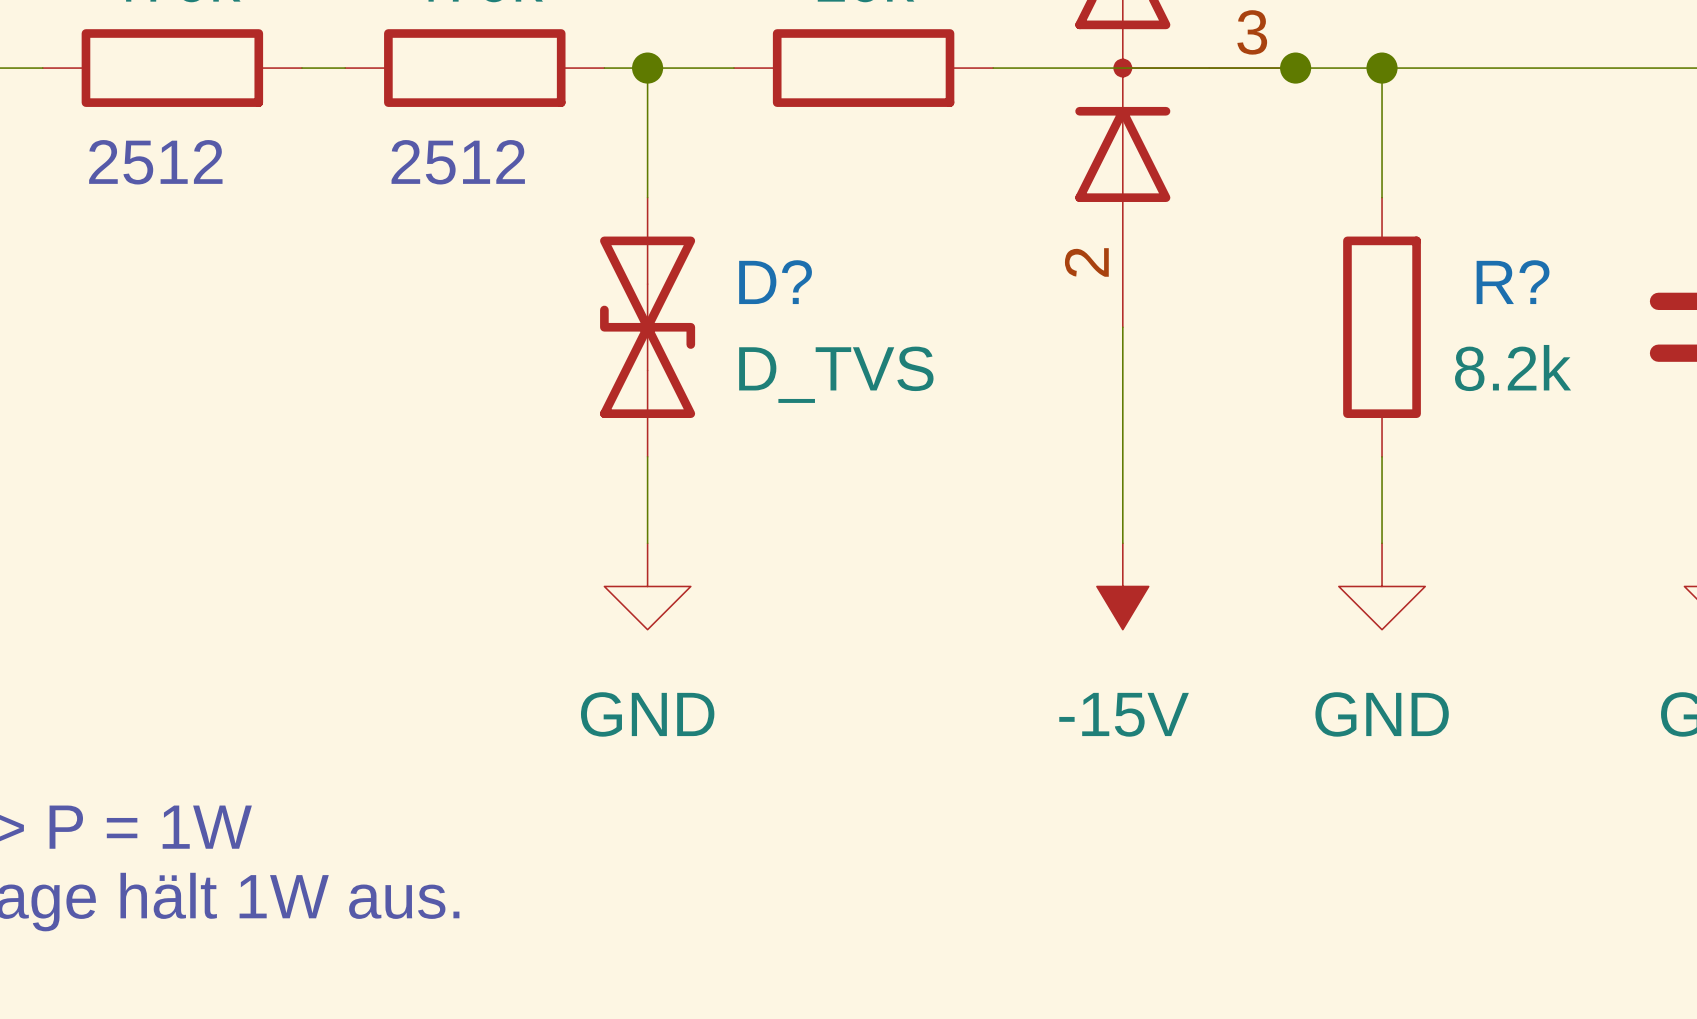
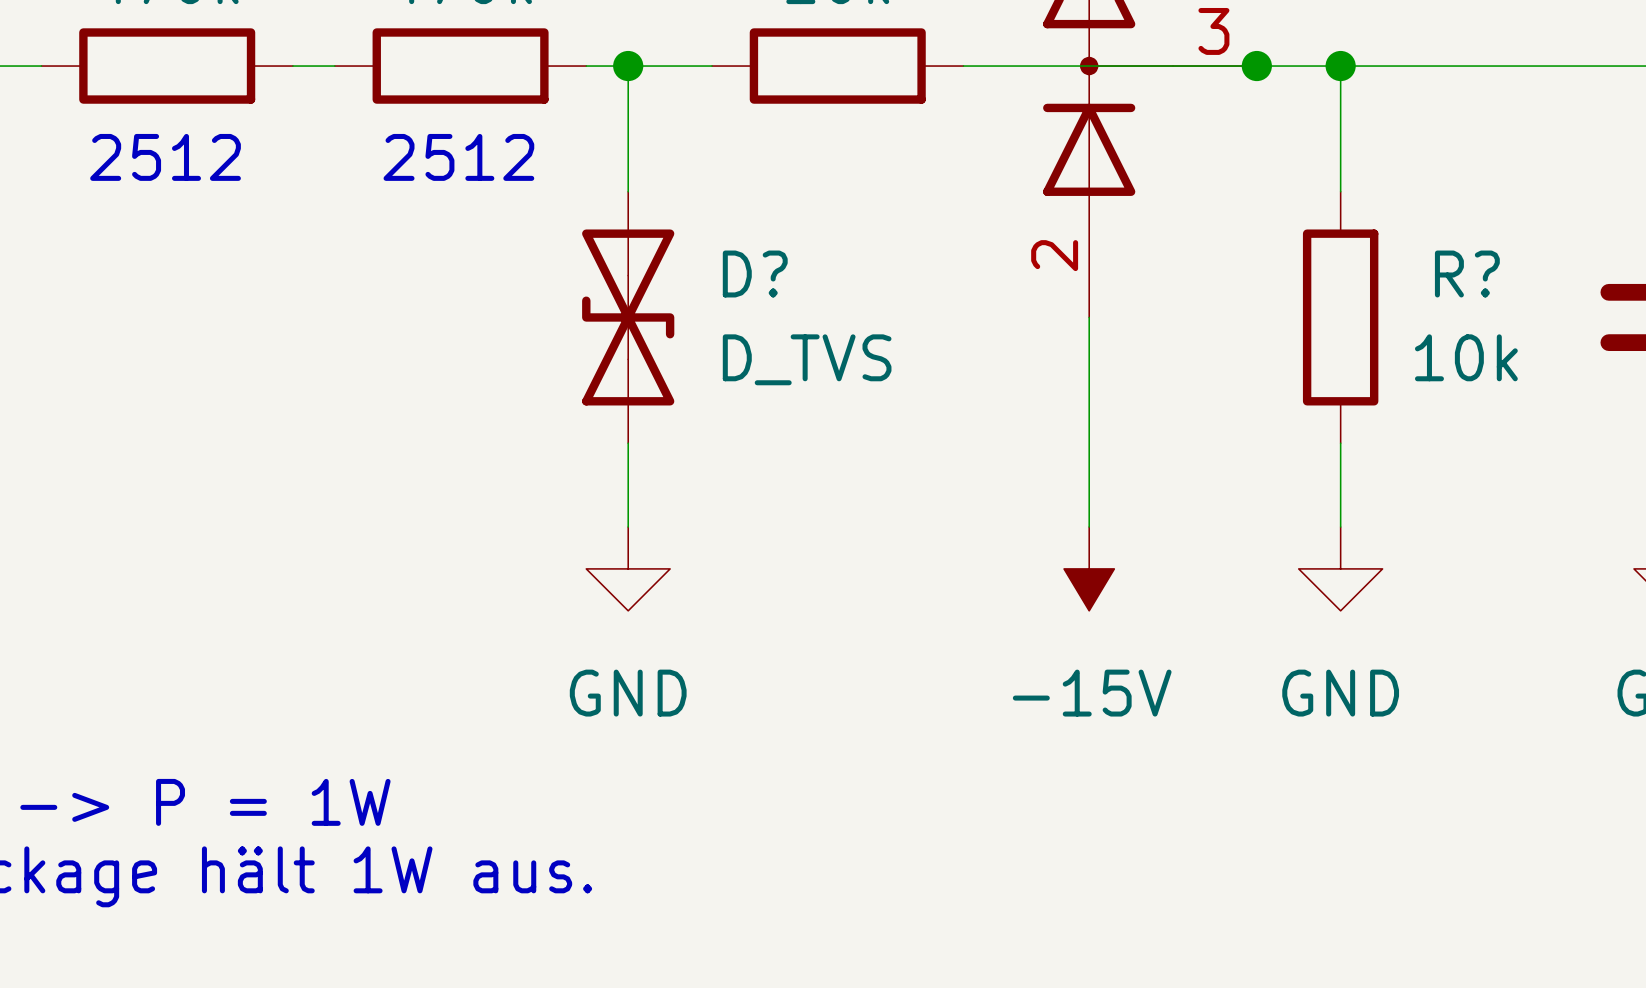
R? value: 8.2k (1513, 368) -> 10k (1466, 357)

